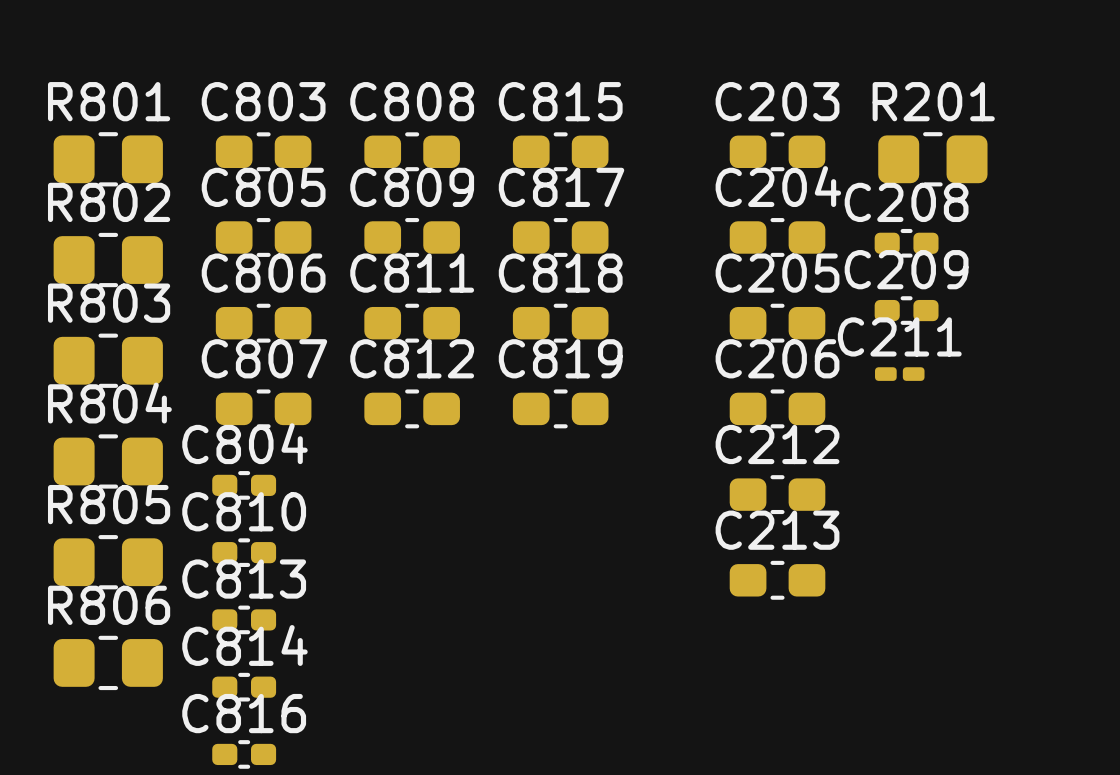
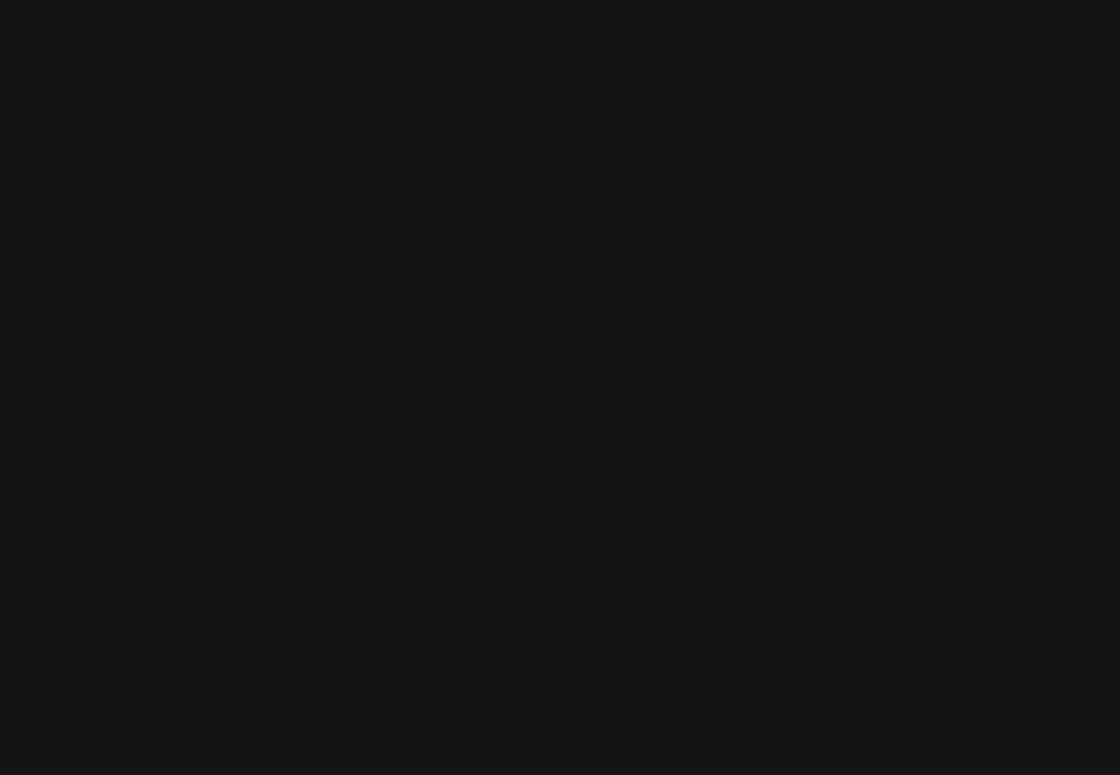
C803: (263, 151) -> none
C808: (412, 151) -> none
C815: (560, 151) -> none
C203: (777, 151) -> none
R801: (108, 159) -> none
R201: (932, 159) -> none
C805: (263, 237) -> none
C809: (412, 237) -> none
C817: (560, 237) -> none
C204: (777, 237) -> none
C208: (906, 243) -> none
R802: (108, 260) -> none
C209: (906, 310) -> none
C806: (263, 323) -> none
C811: (412, 323) -> none
C818: (560, 323) -> none
C205: (777, 323) -> none
R803: (108, 360) -> none
C211: (899, 374) -> none
C807: (263, 408) -> none
C812: (412, 408) -> none
C819: (560, 408) -> none
C206: (777, 408) -> none
R804: (108, 461) -> none
C804: (244, 485) -> none
C212: (777, 494) -> none
C810: (244, 552) -> none
R805: (108, 562) -> none
C213: (777, 580) -> none
C813: (244, 619) -> none
R806: (108, 662) -> none
C814: (244, 687) -> none
C816: (244, 754) -> none

